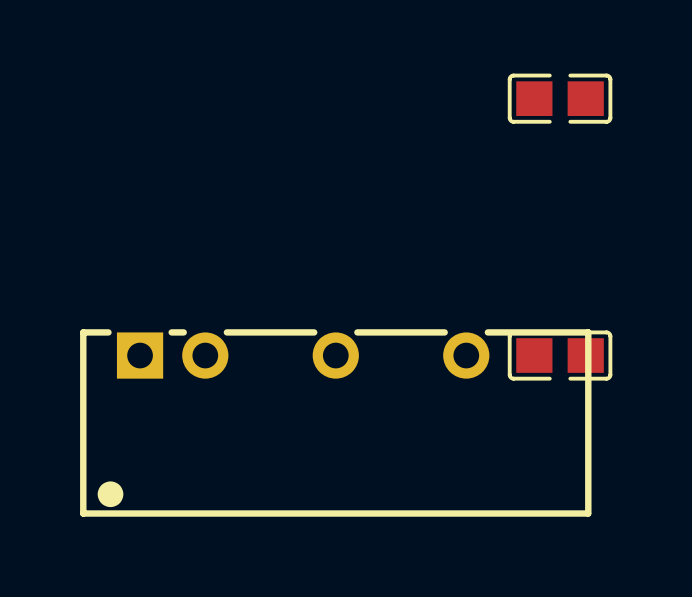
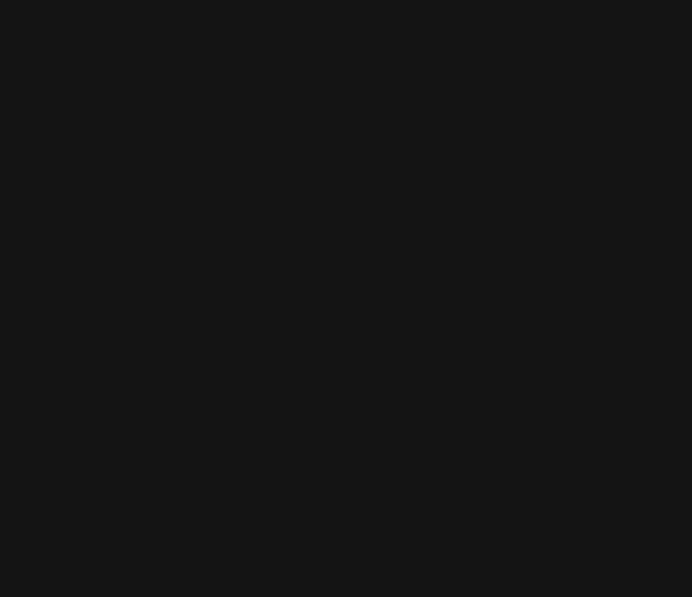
part: (560, 98) -> none
part: (560, 355) -> none
part: (335, 422) -> none

